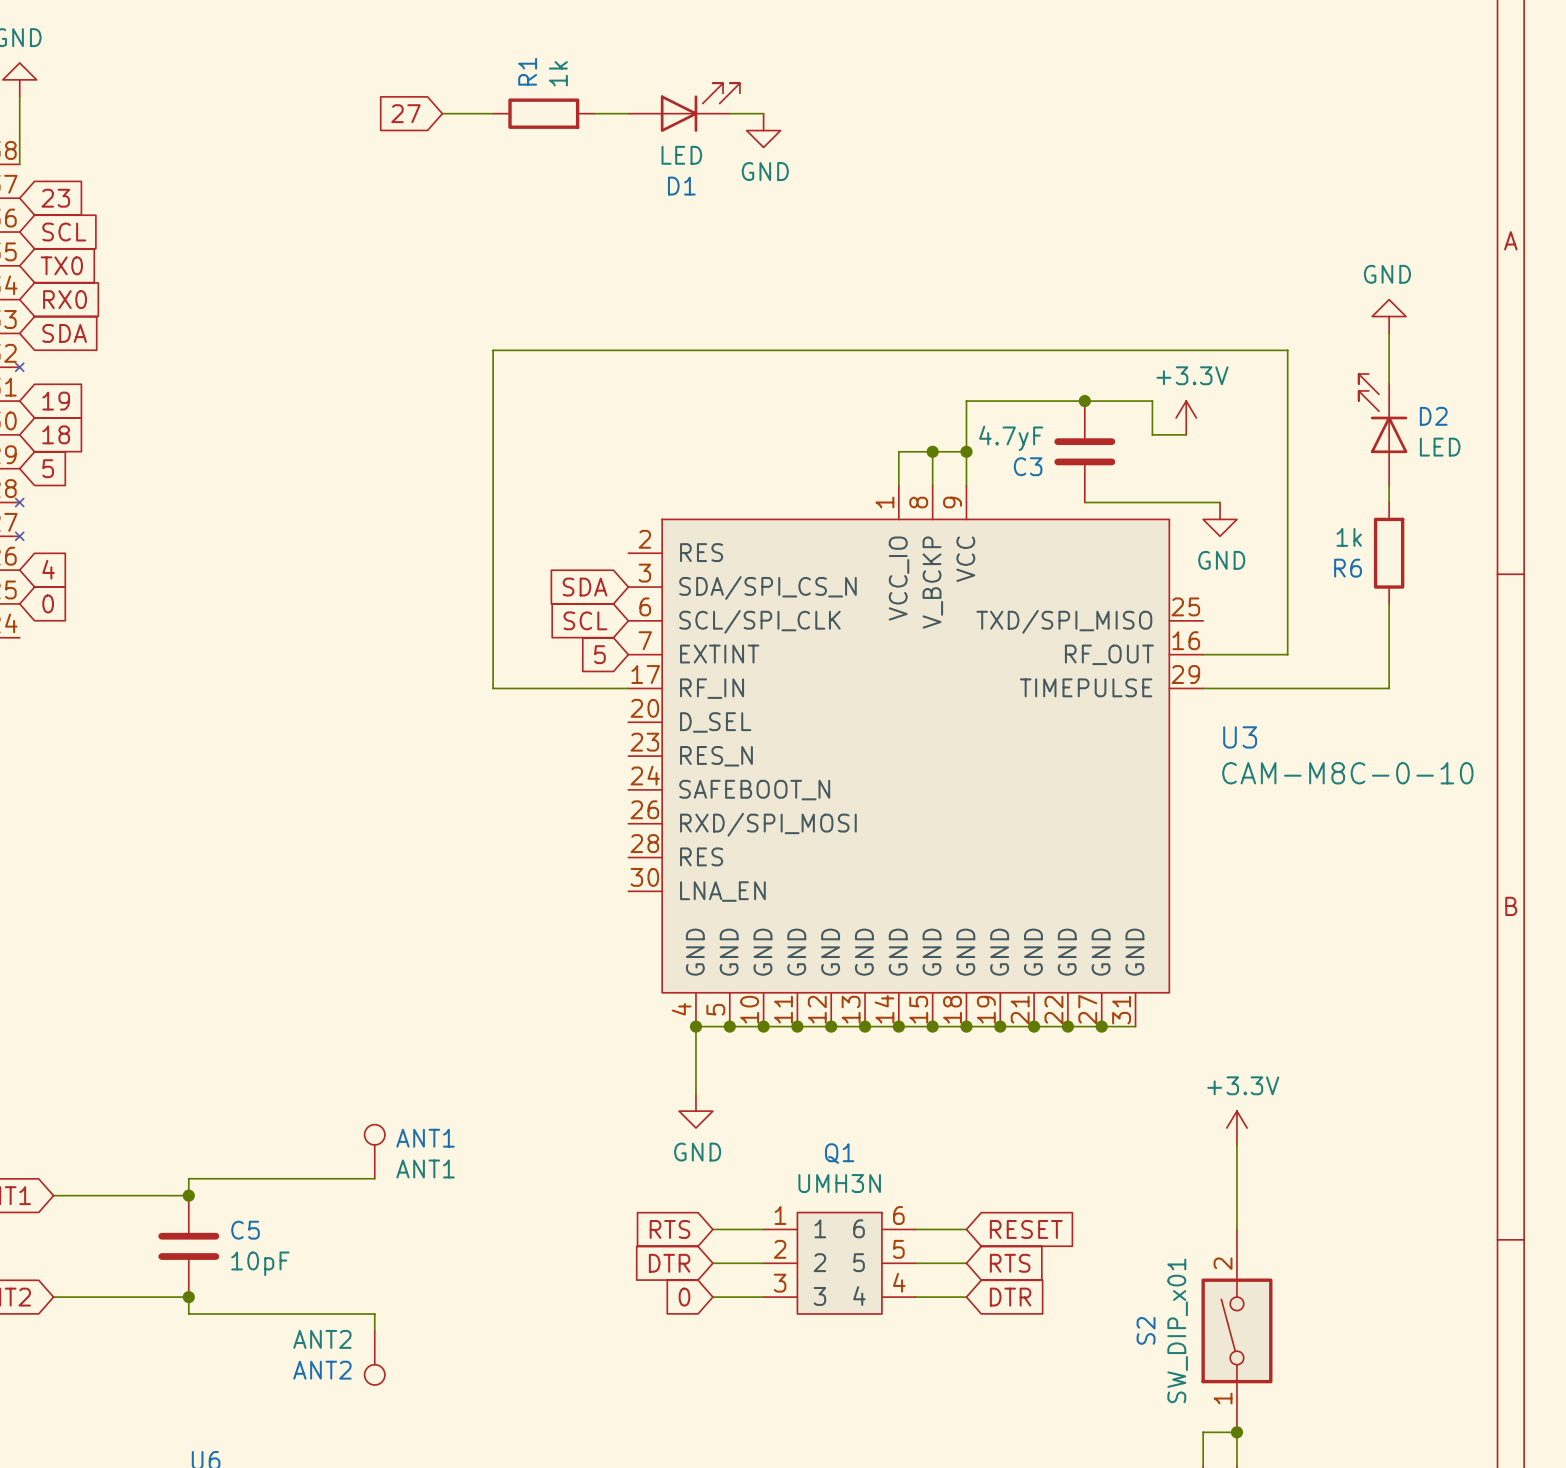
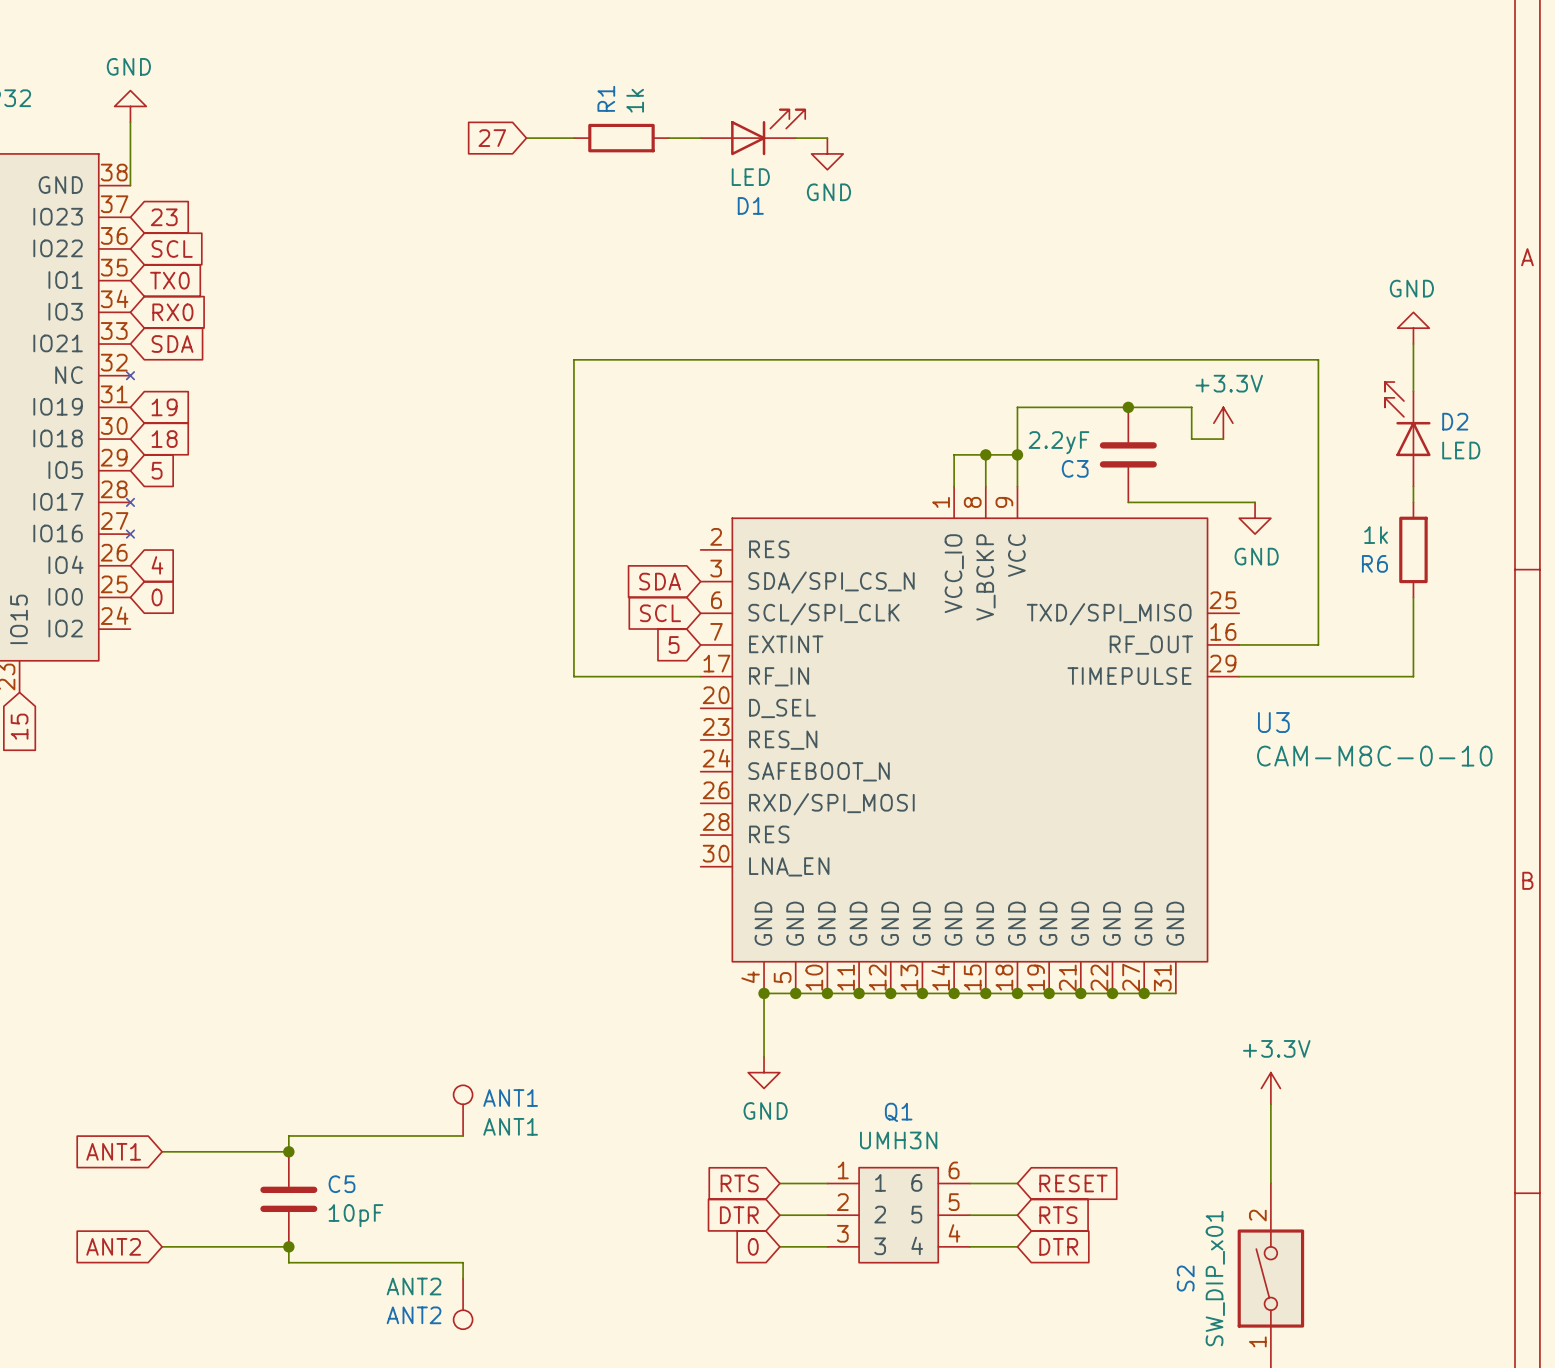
C3 value: 4.7yF (1011, 438) -> 2.2yF (1058, 442)

